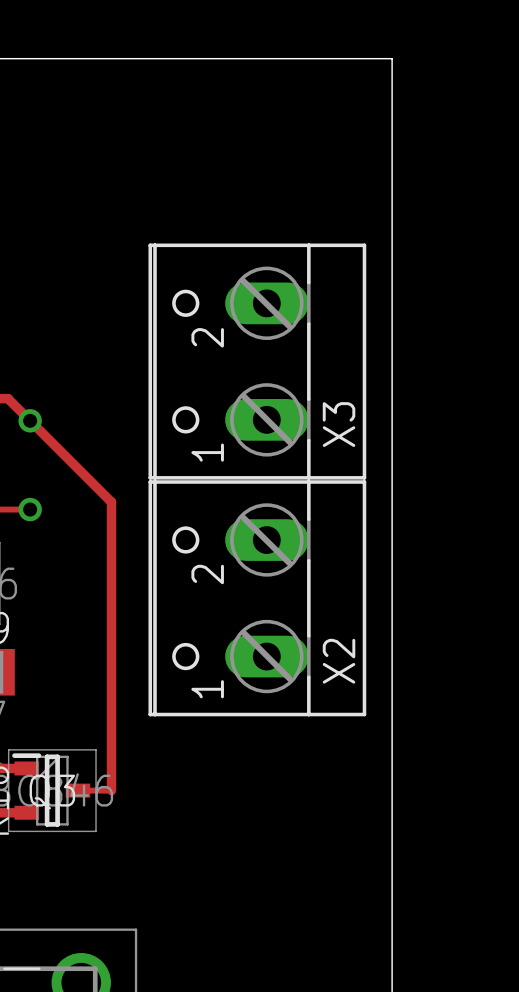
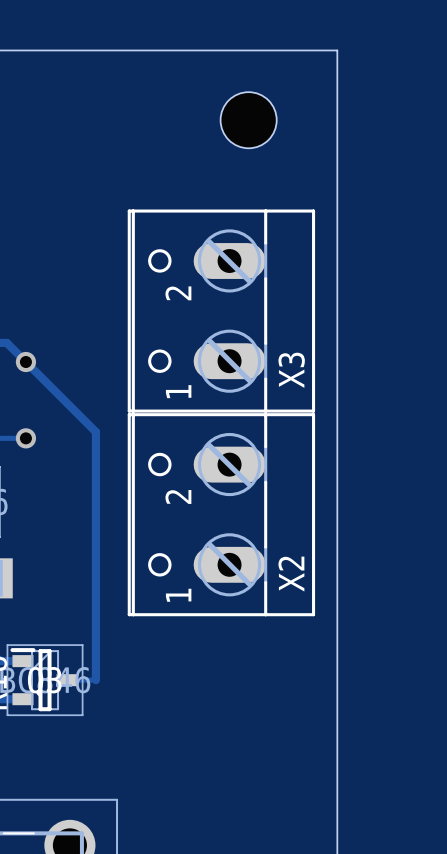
hole: none -> (248, 120)

